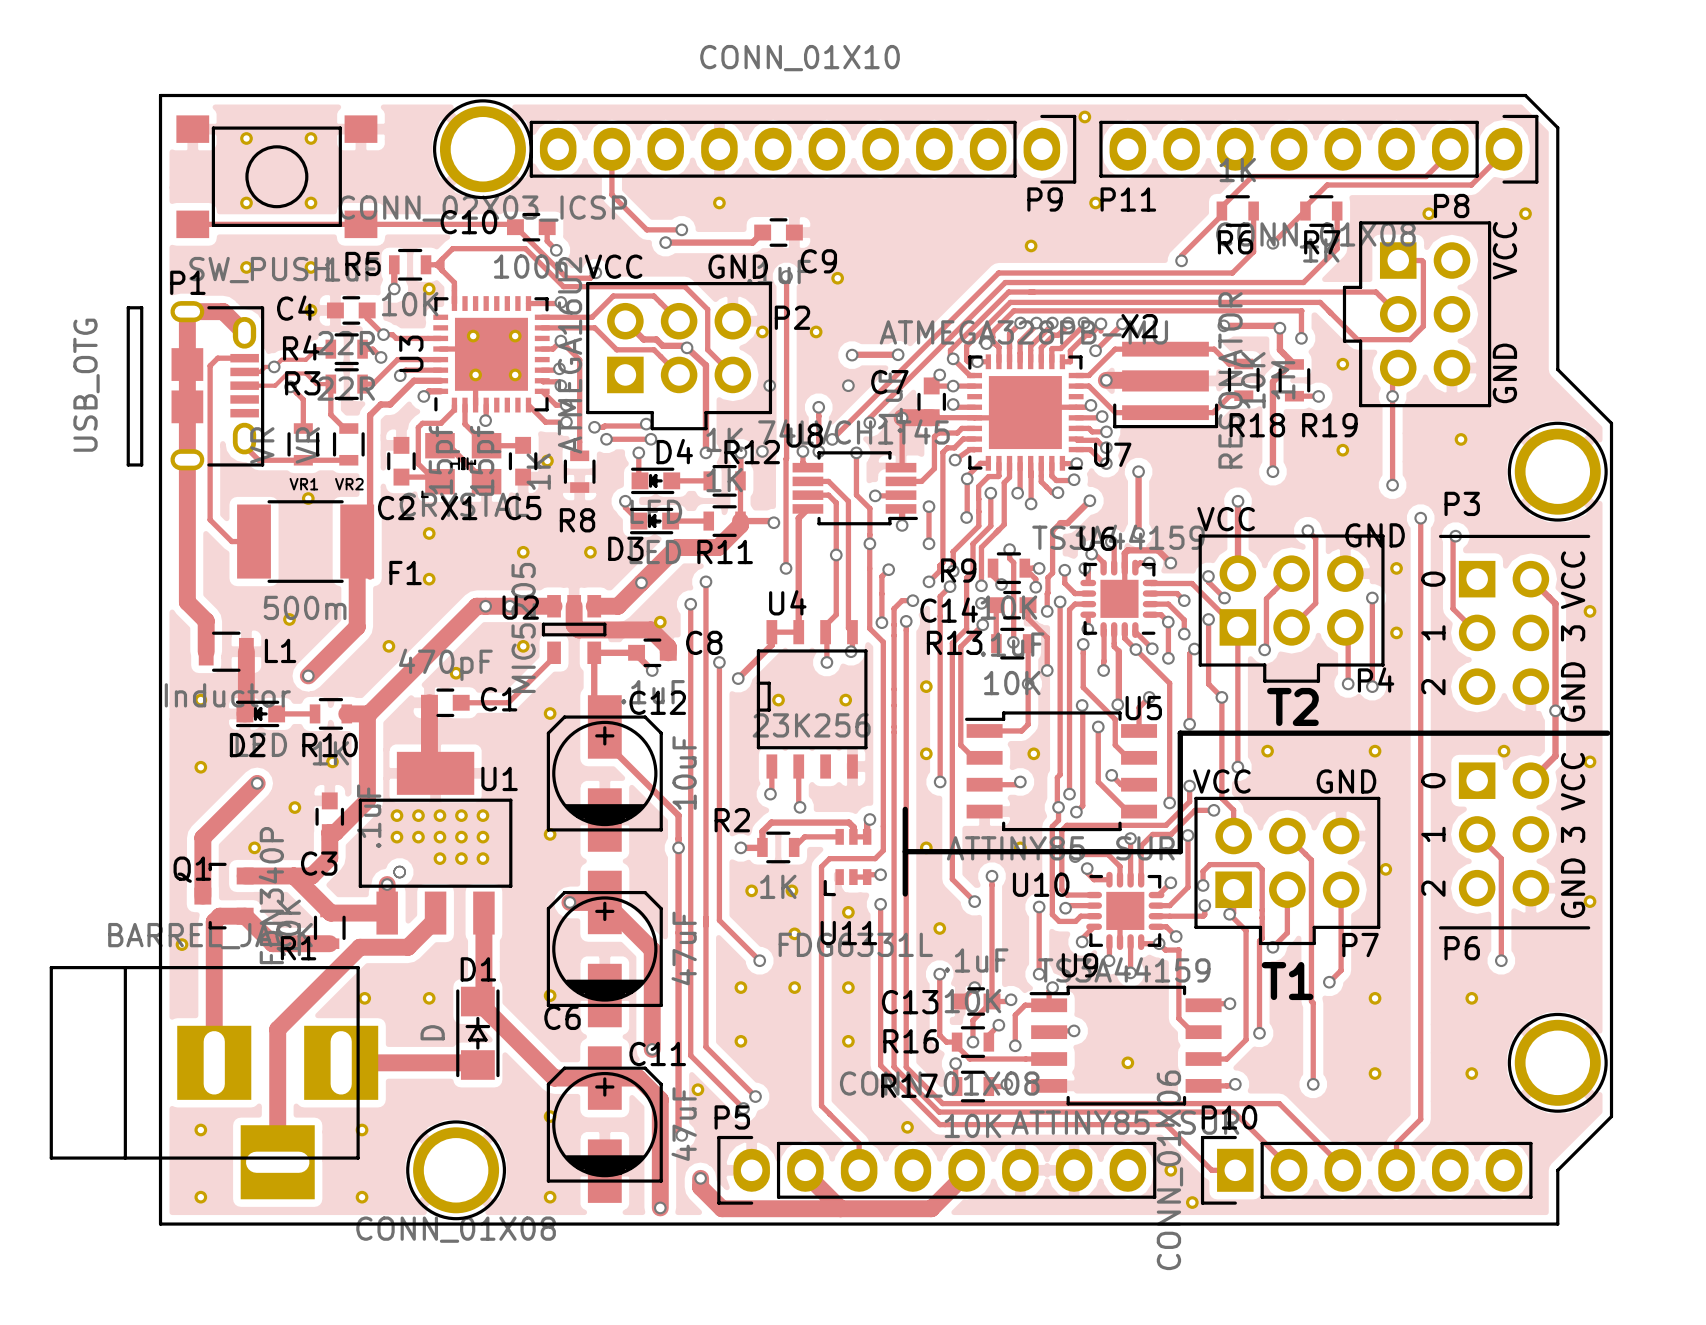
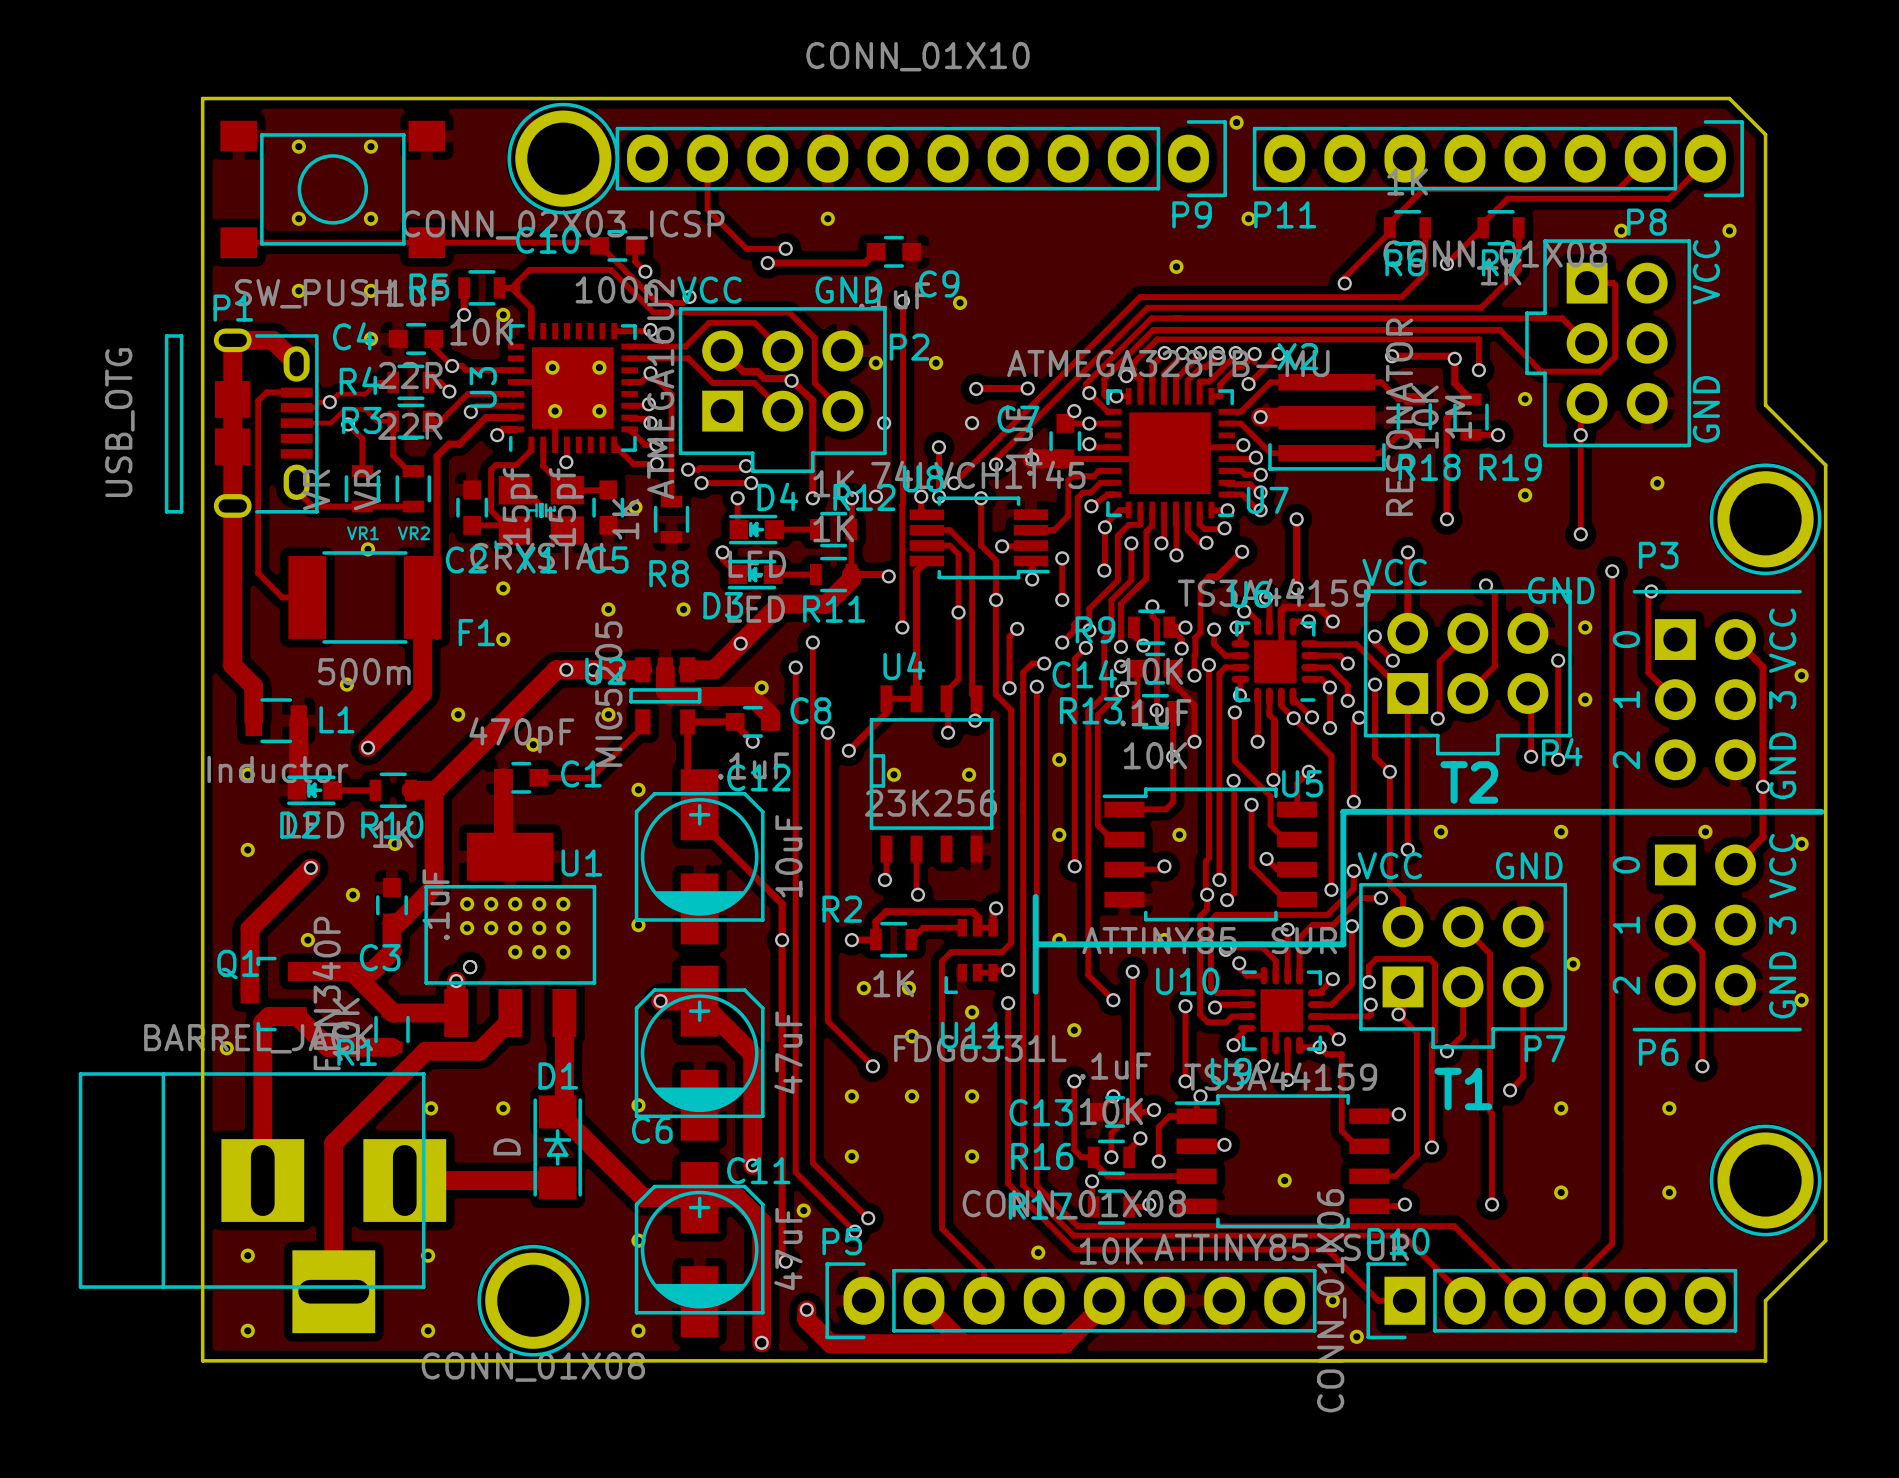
track: (902, 417) (901, 467) -> none

